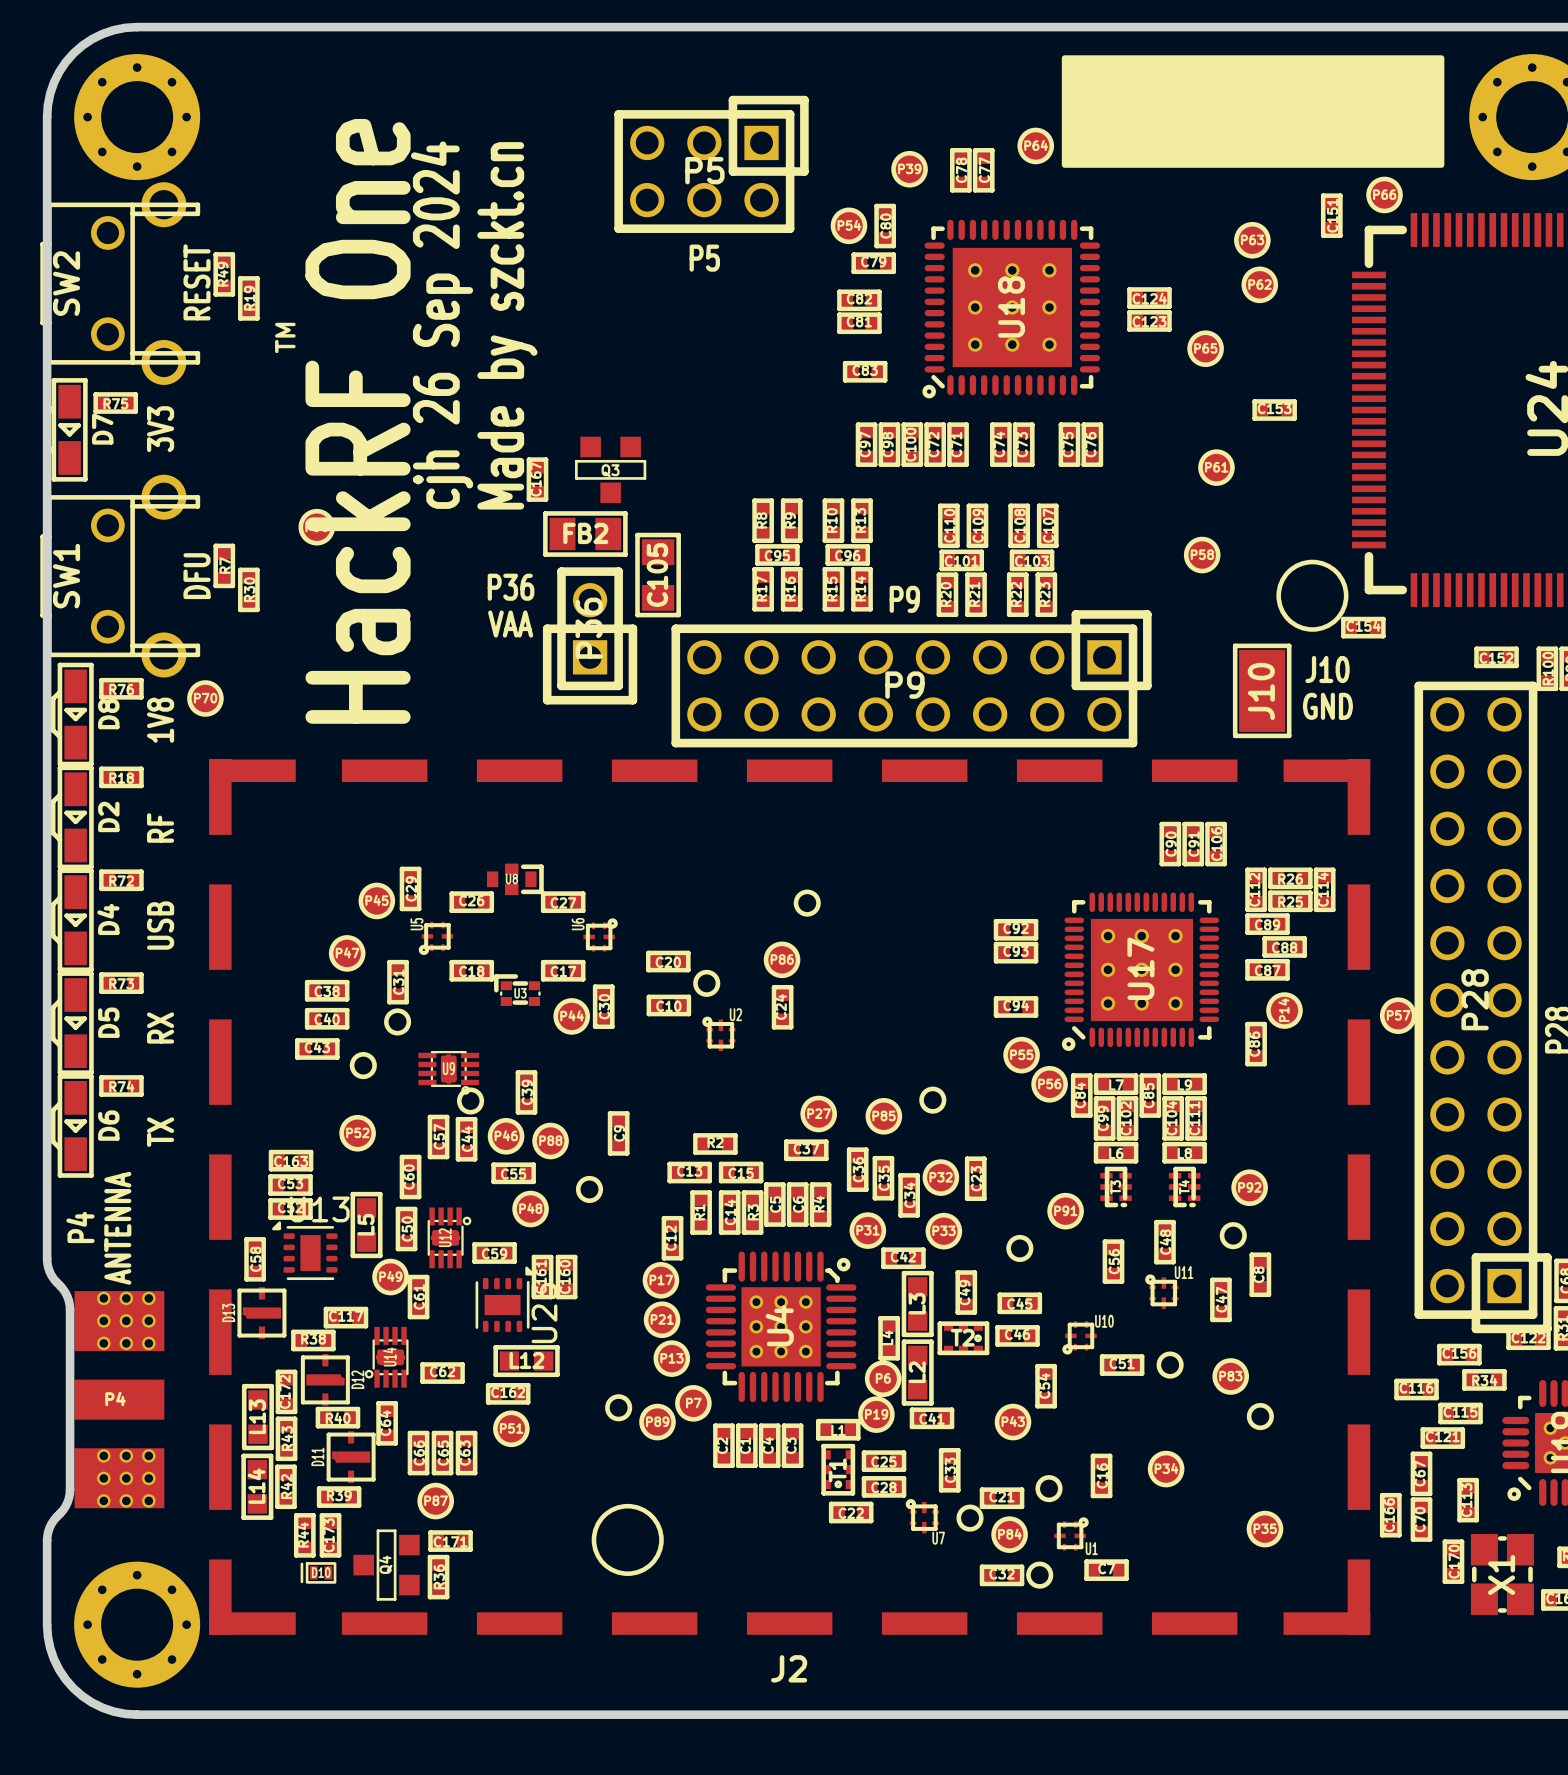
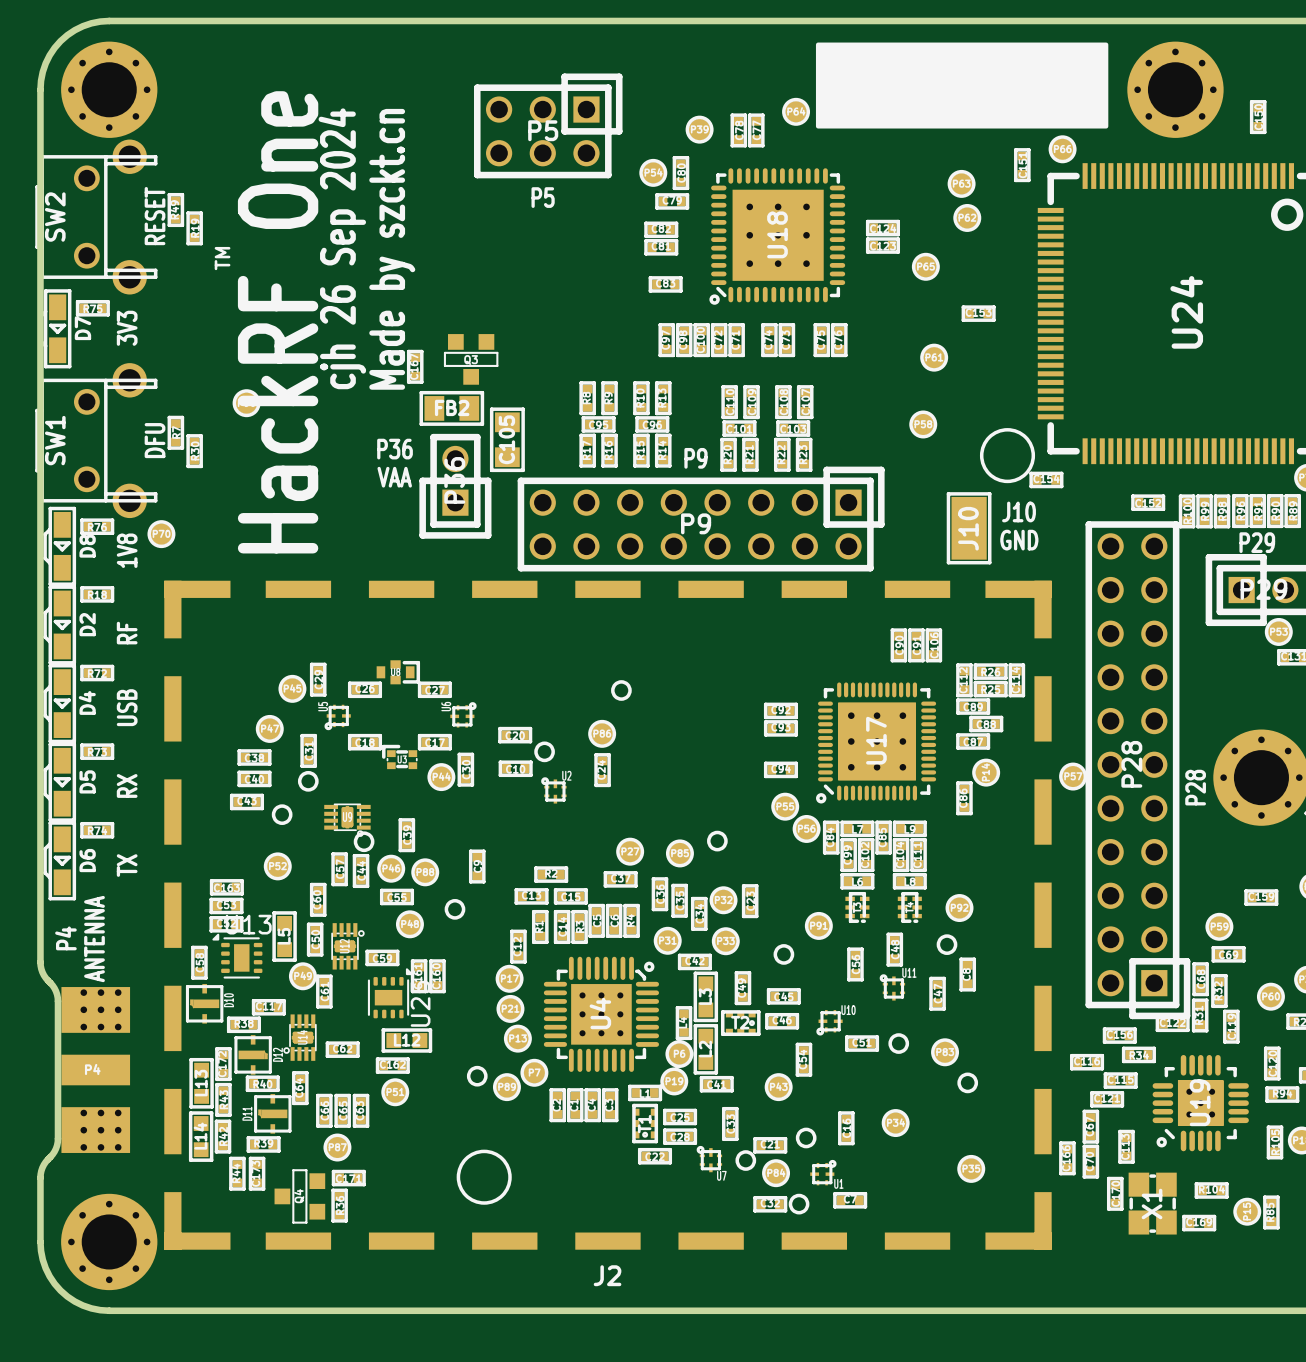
D13 name: D13 (228, 1312) -> D10 (228, 1000)
D10: (318, 1572) -> none

